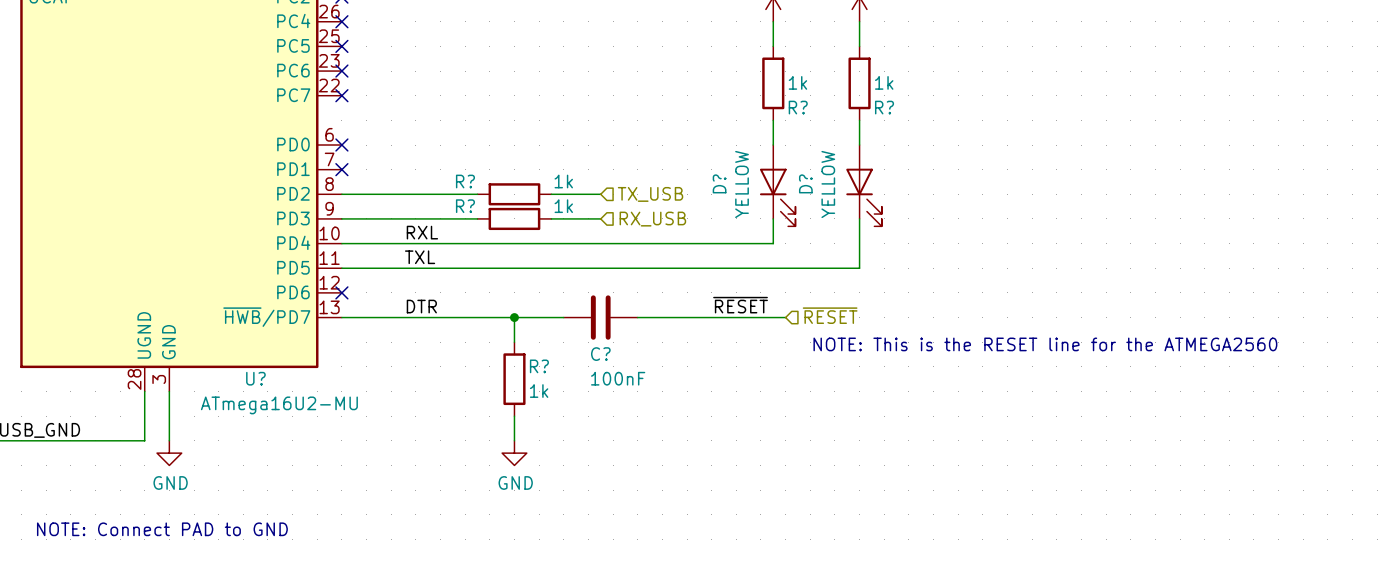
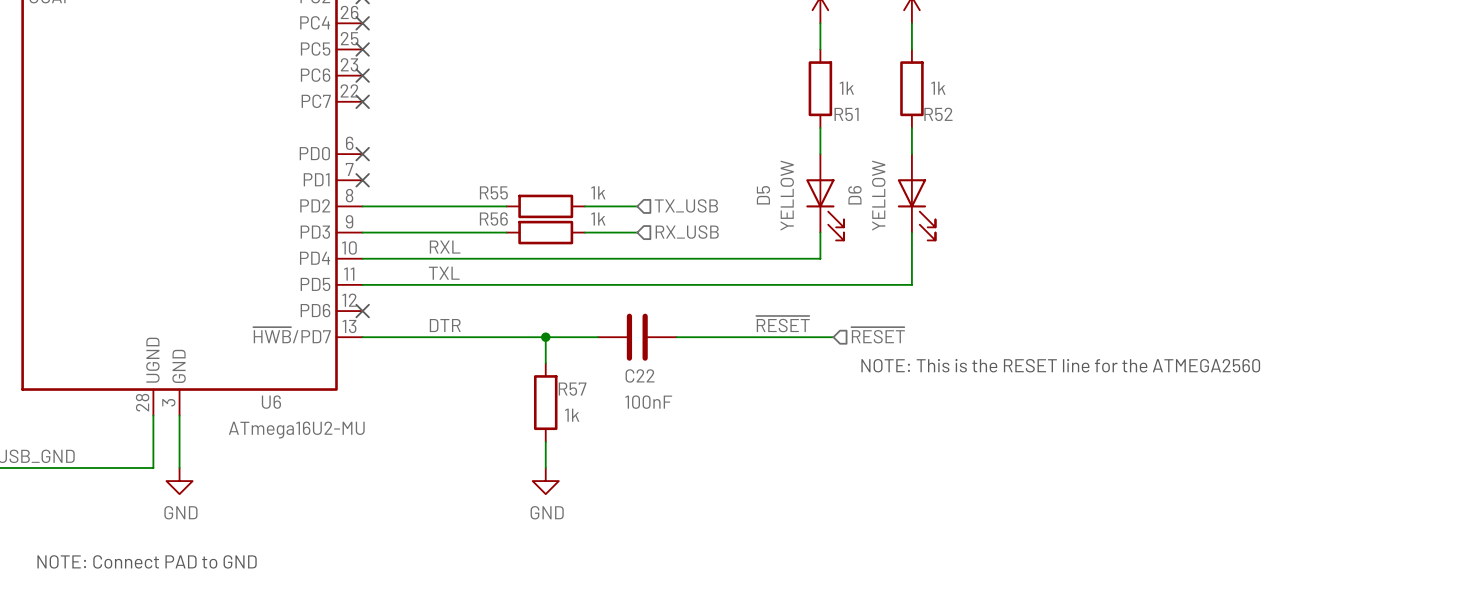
R? name: R? (798, 107) -> R51 (846, 114)
R? name: R? (884, 107) -> R52 (938, 114)
R? name: R? (465, 181) -> R55 (493, 192)
D? name: D? (719, 183) -> D5 (763, 195)
D? name: D? (805, 183) -> D6 (854, 195)
R? name: R? (465, 206) -> R56 (493, 219)
C? name: C? (600, 354) -> C22 (640, 375)
R? name: R? (539, 366) -> R57 (572, 389)
U? name: U? (255, 378) -> U6 (271, 402)

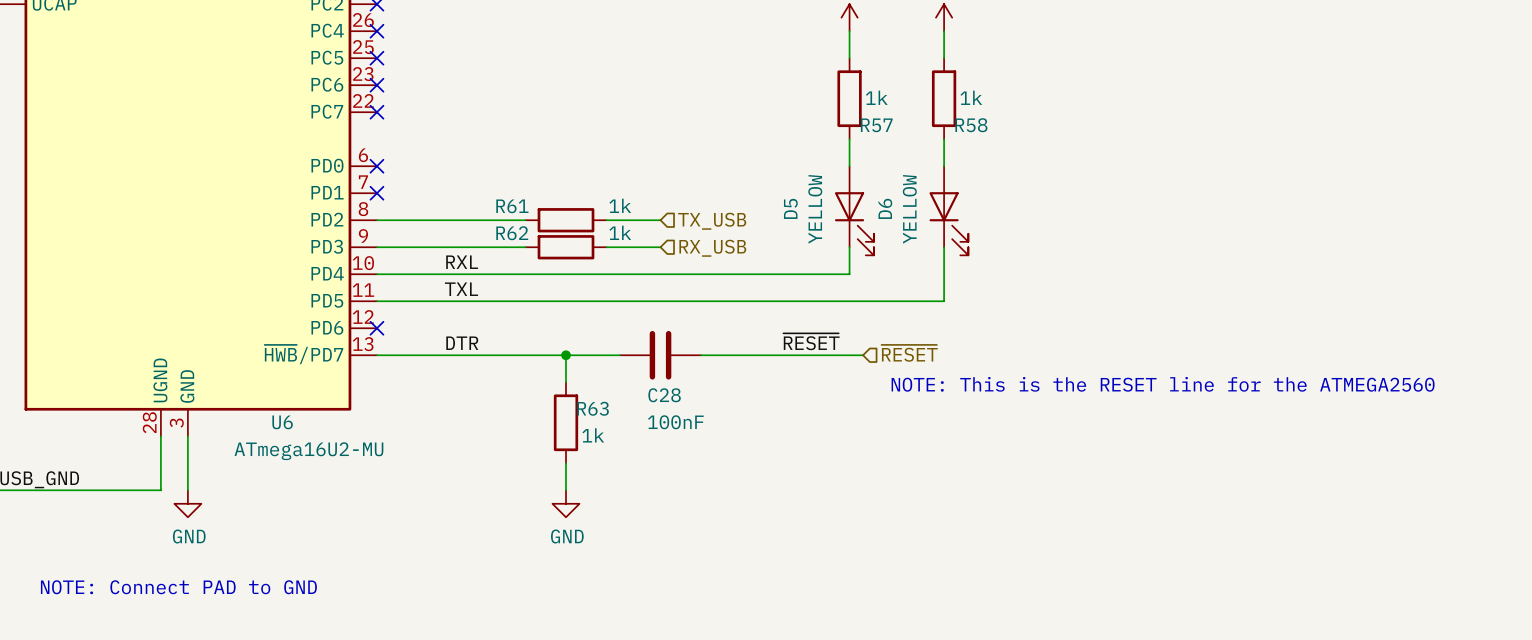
R51 name: R51 (846, 114) -> R57 (876, 125)
R52 name: R52 (938, 114) -> R58 (971, 125)
R55 name: R55 (493, 192) -> R61 (512, 206)
R56 name: R56 (493, 219) -> R62 (512, 233)
C22 name: C22 (640, 375) -> C28 (664, 395)
R57 name: R57 (572, 389) -> R63 (593, 408)

